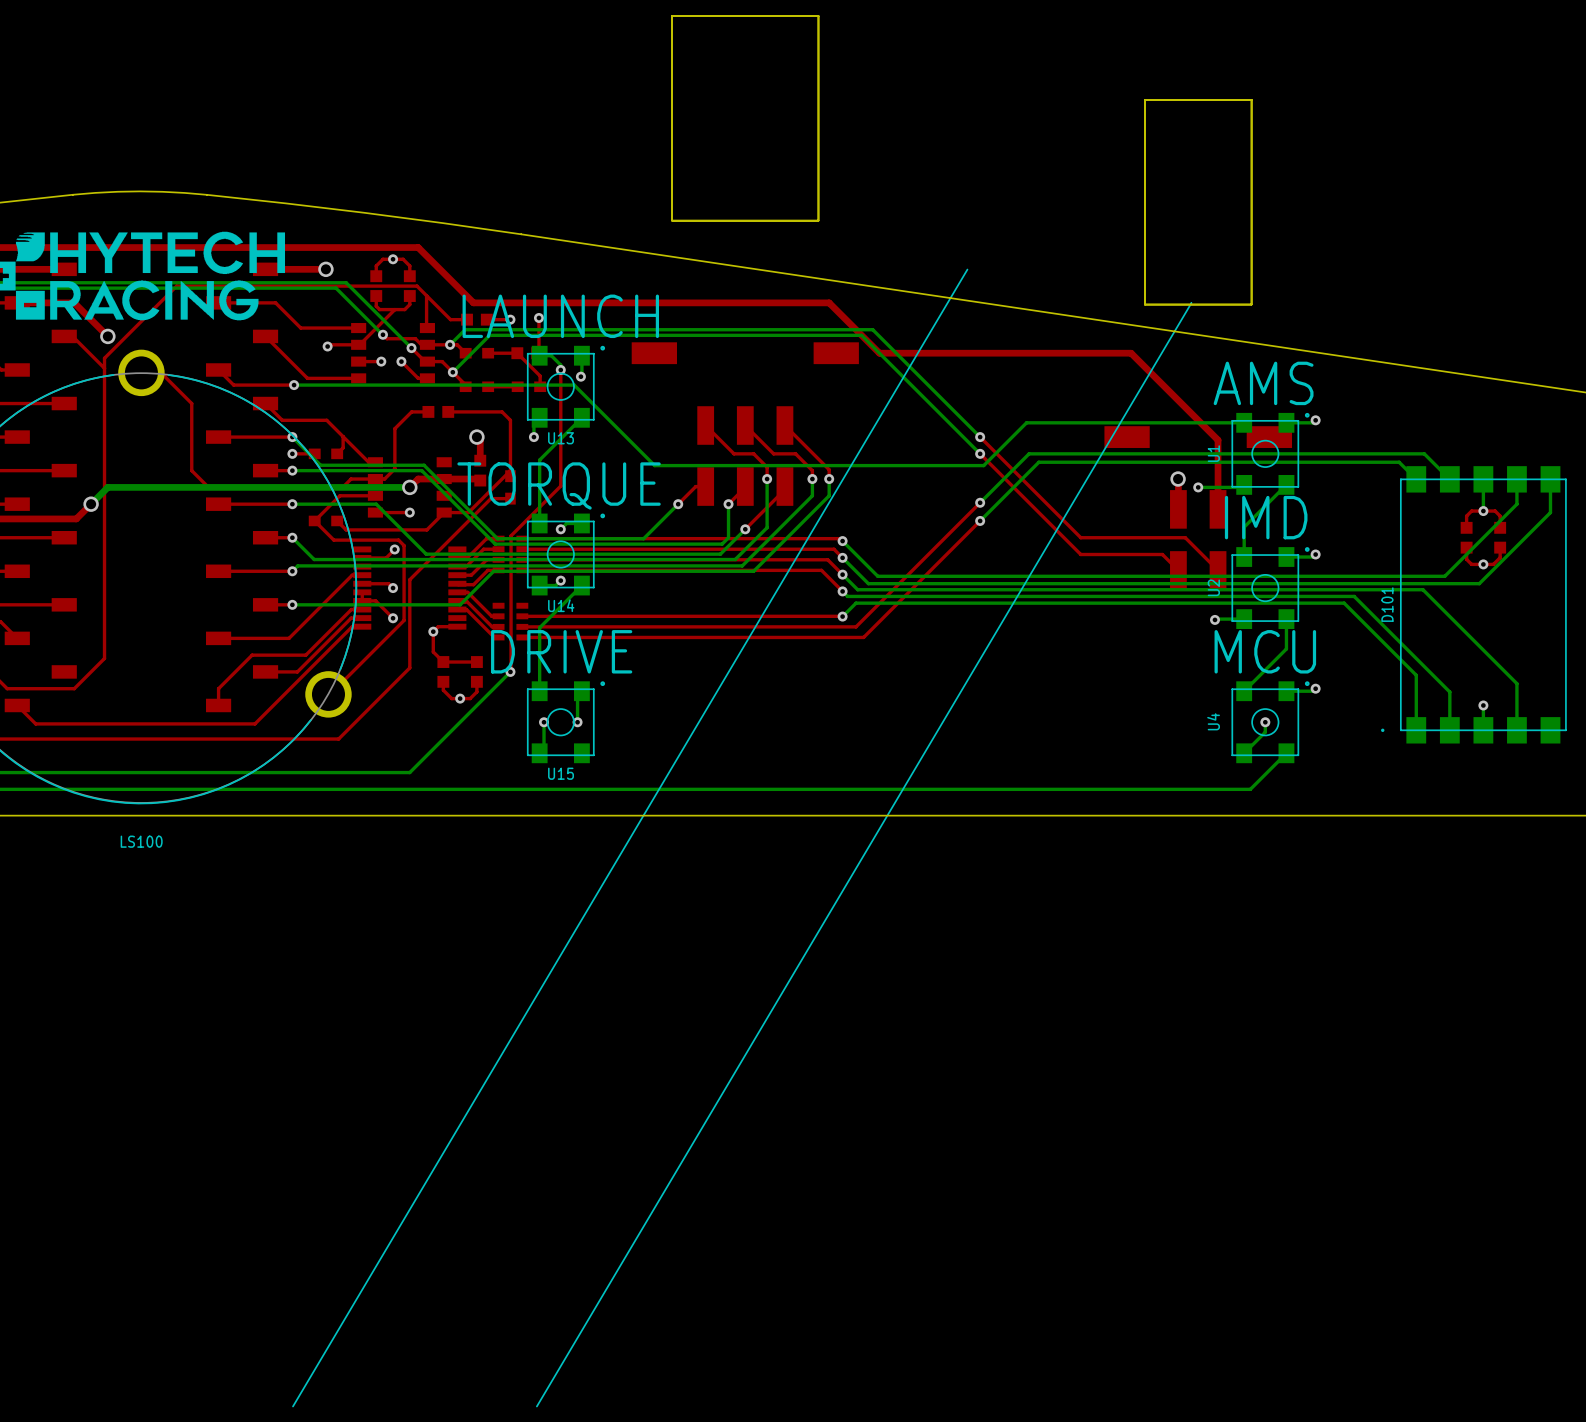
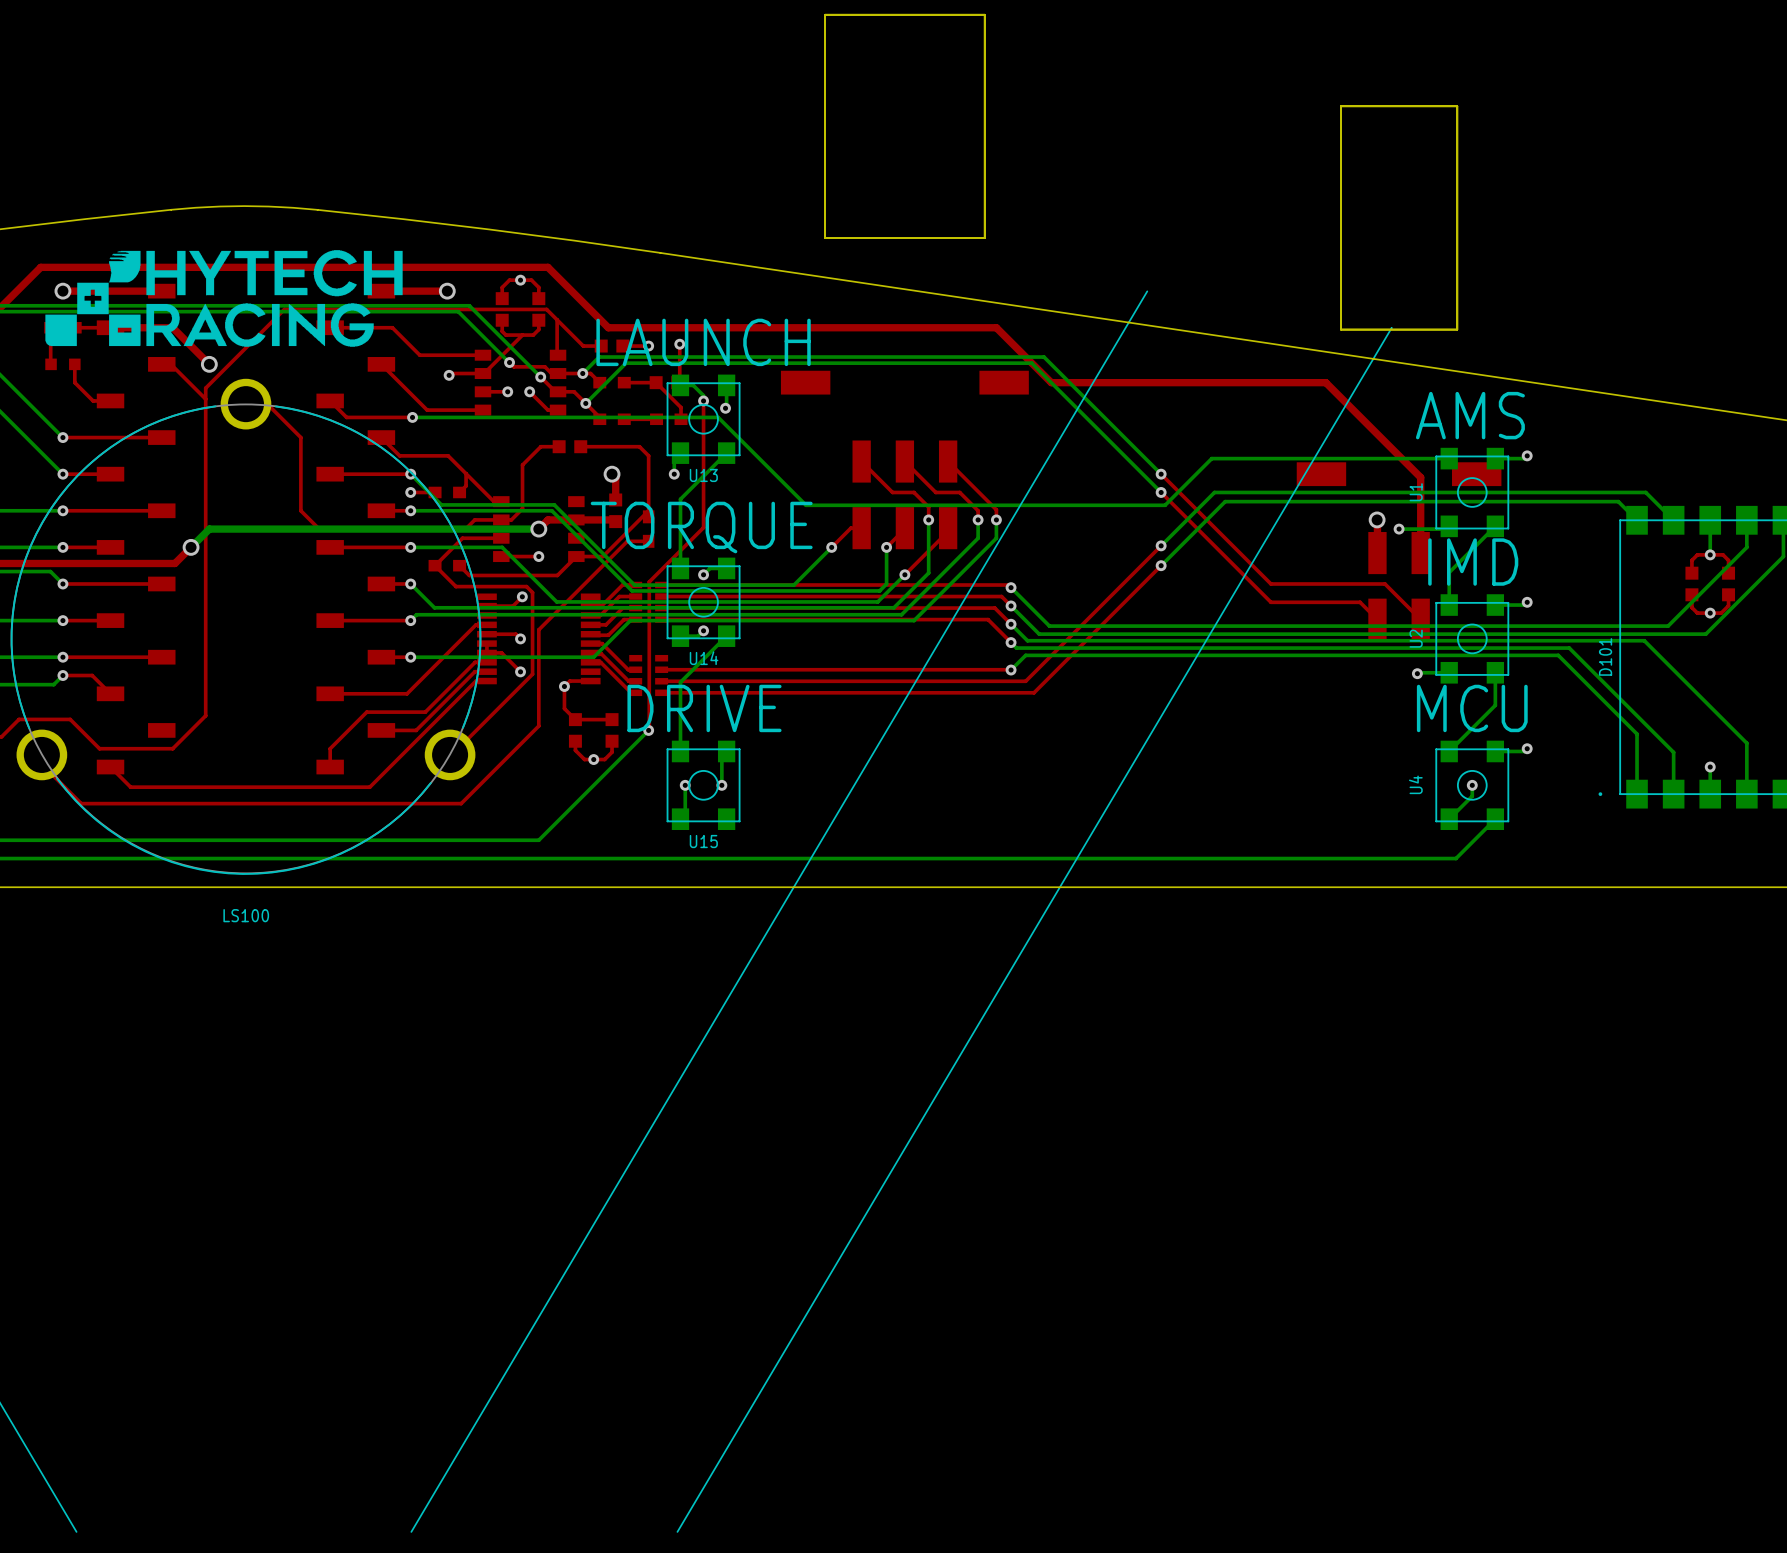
U13 footprint: [526, 345, 606, 428] -> [666, 374, 741, 464]
U1 footprint: [1231, 412, 1310, 495] -> [1435, 447, 1510, 538]
U14 footprint: [526, 513, 606, 596] -> [666, 557, 741, 647]
U2 footprint: [1231, 547, 1310, 630] -> [1435, 594, 1510, 684]
U15 footprint: [526, 681, 606, 764] -> [666, 740, 741, 831]
U4 footprint: [1231, 681, 1310, 764] -> [1435, 740, 1510, 831]

